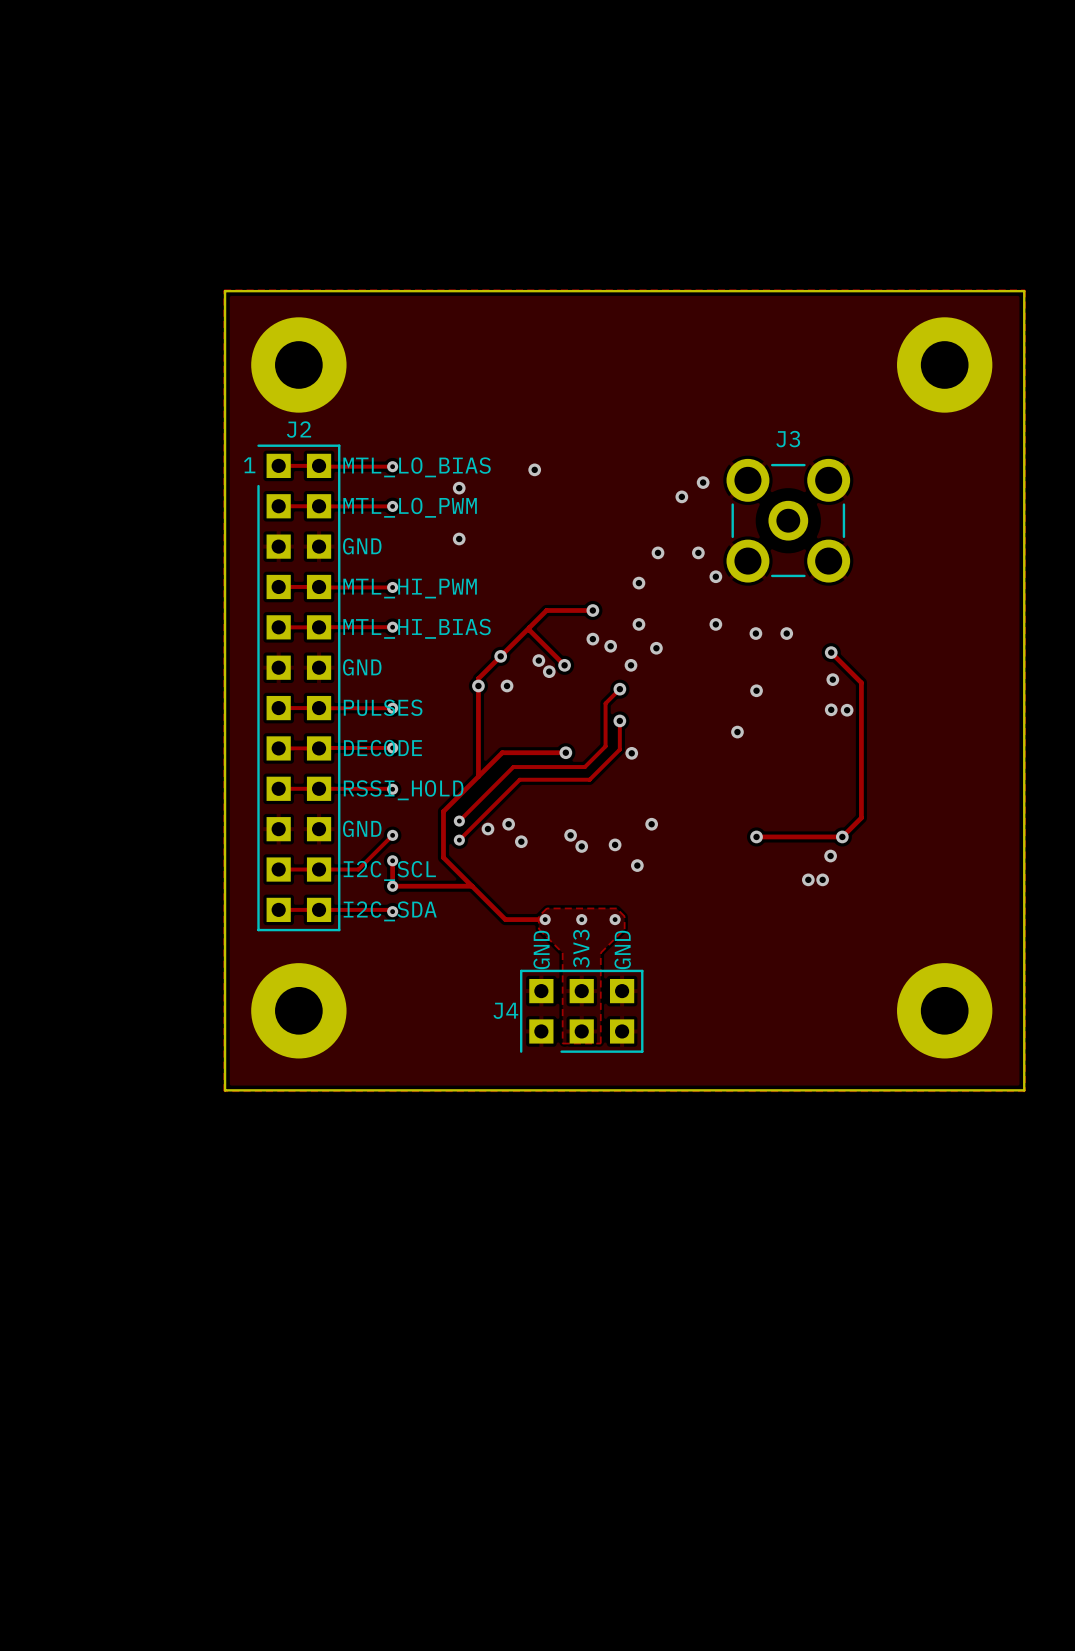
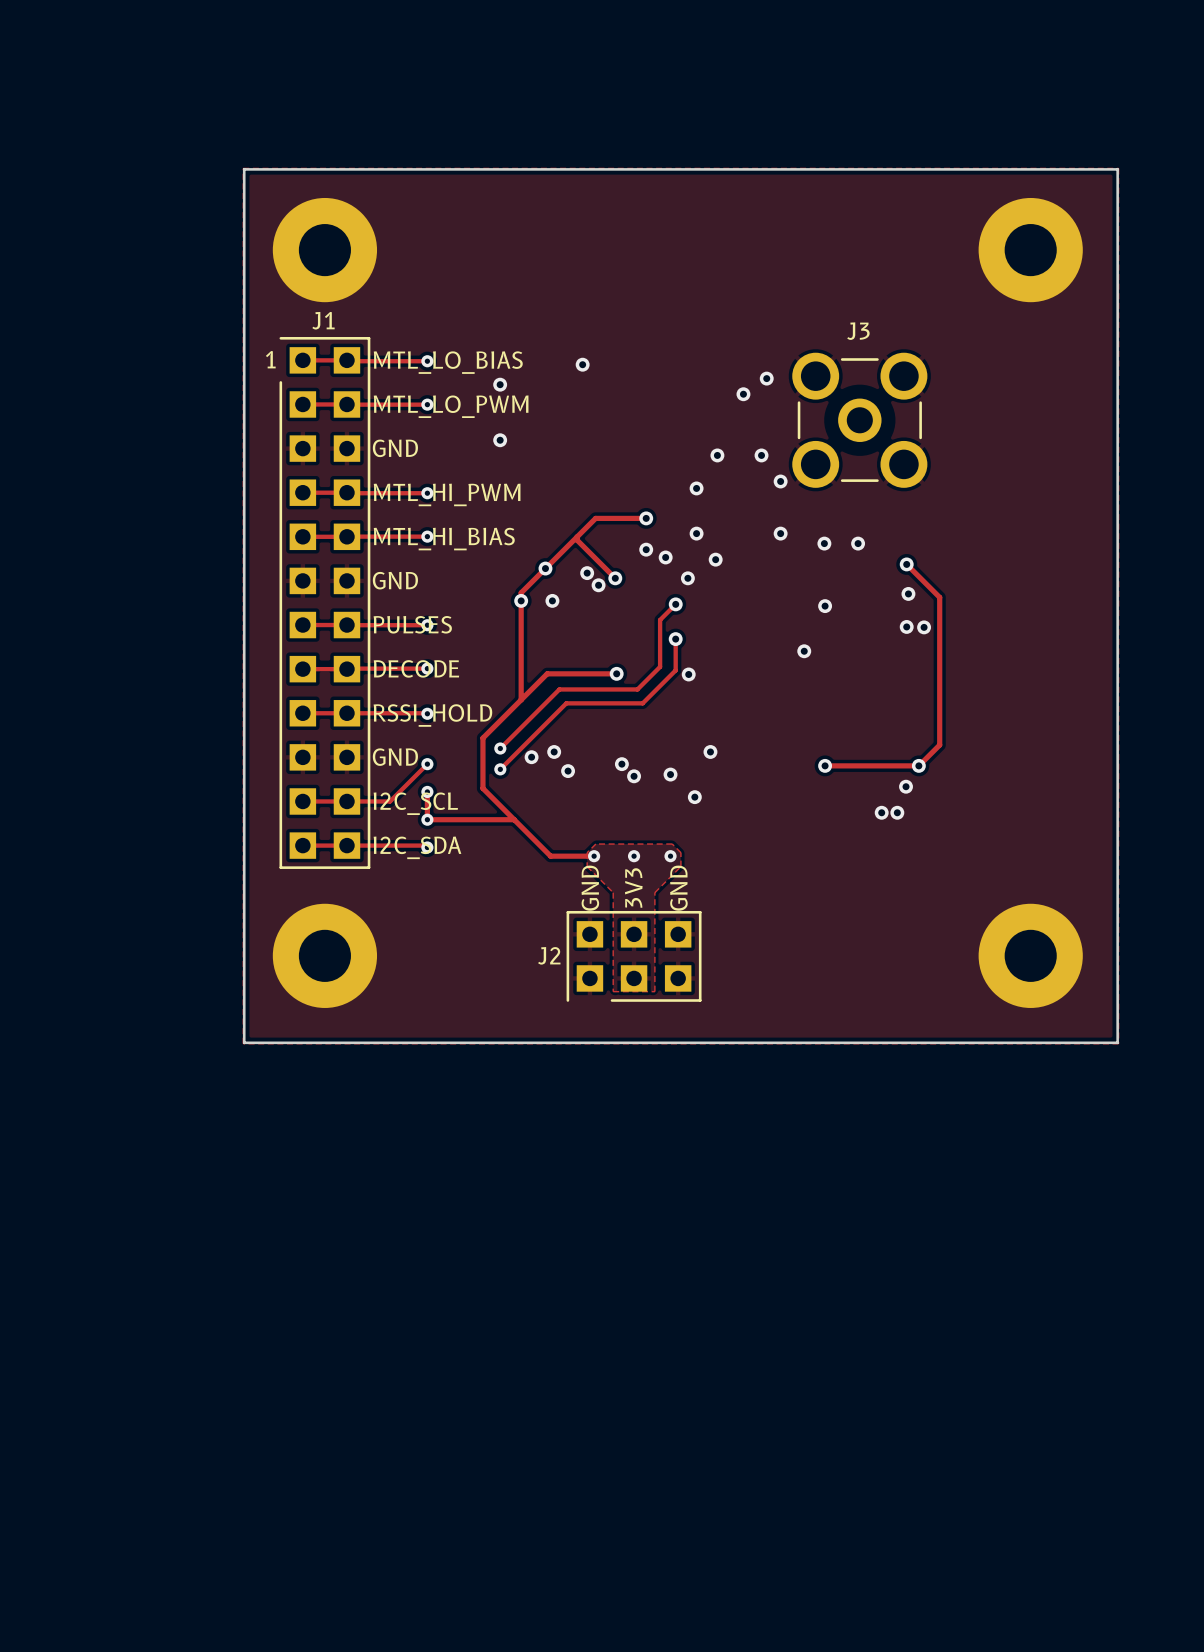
J2 name: J2 (298, 429) -> J1 (323, 320)
J4 name: J4 (505, 1010) -> J2 (549, 955)

